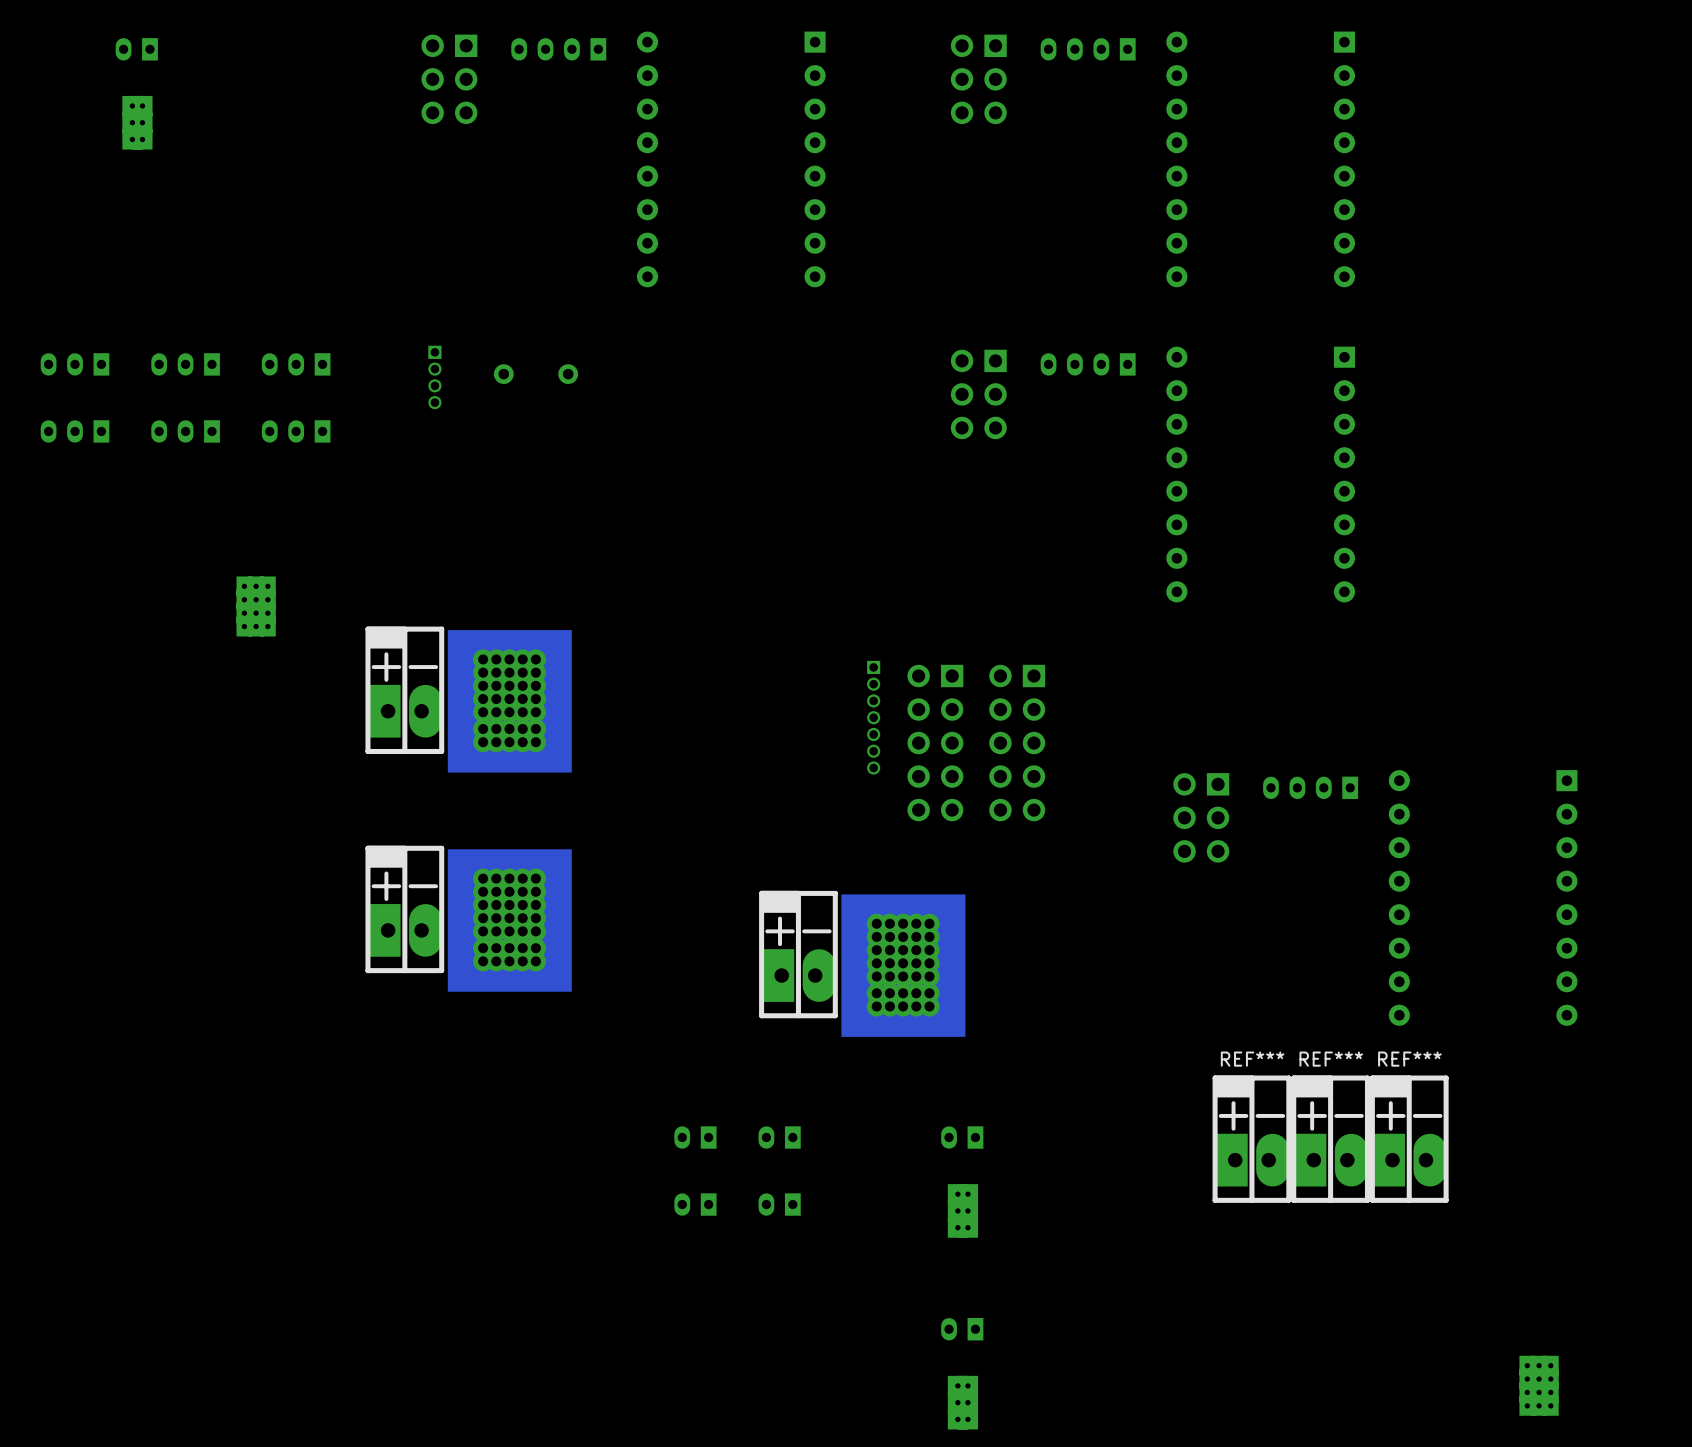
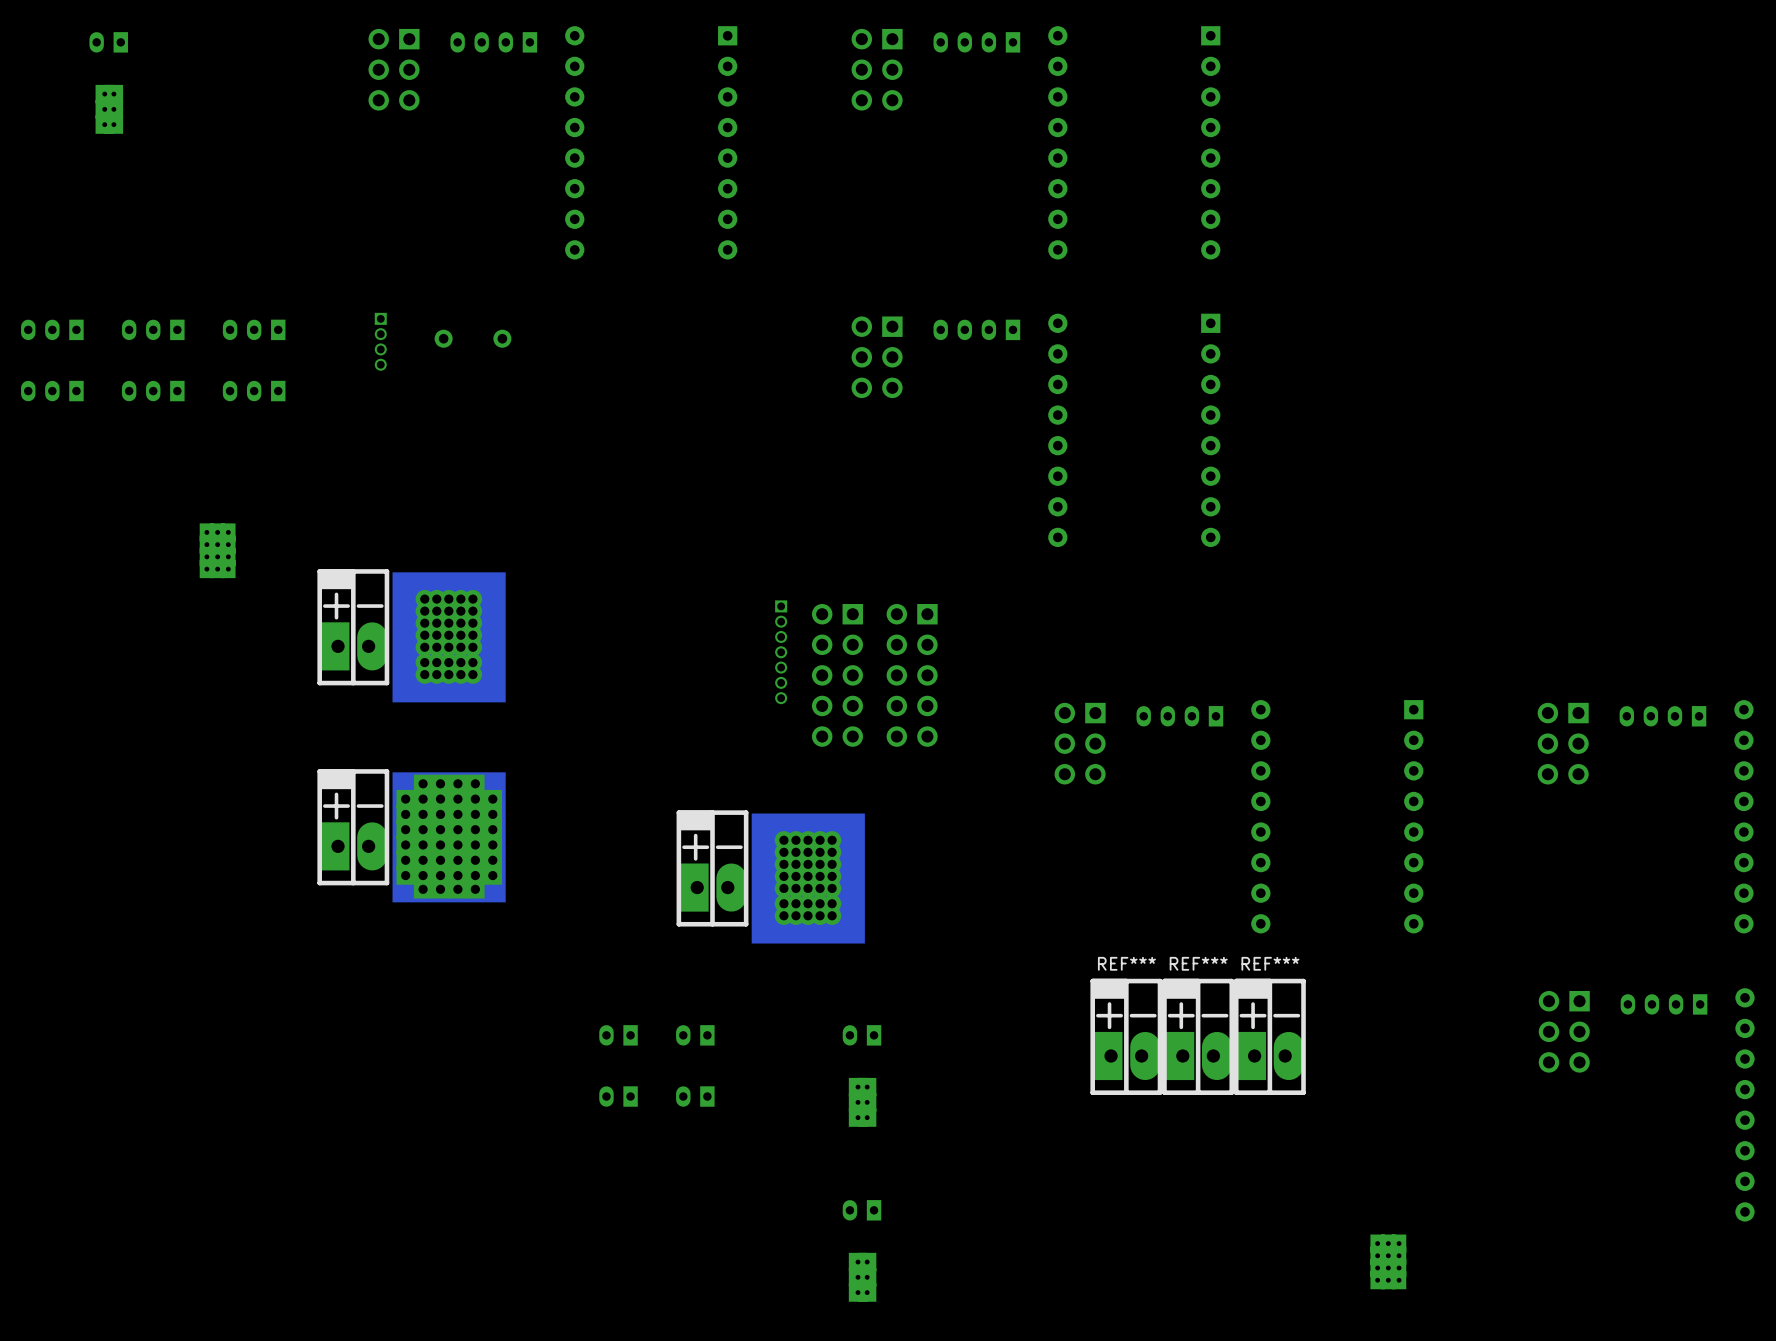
part footprint: [447, 849, 572, 992] -> [392, 772, 506, 903]

